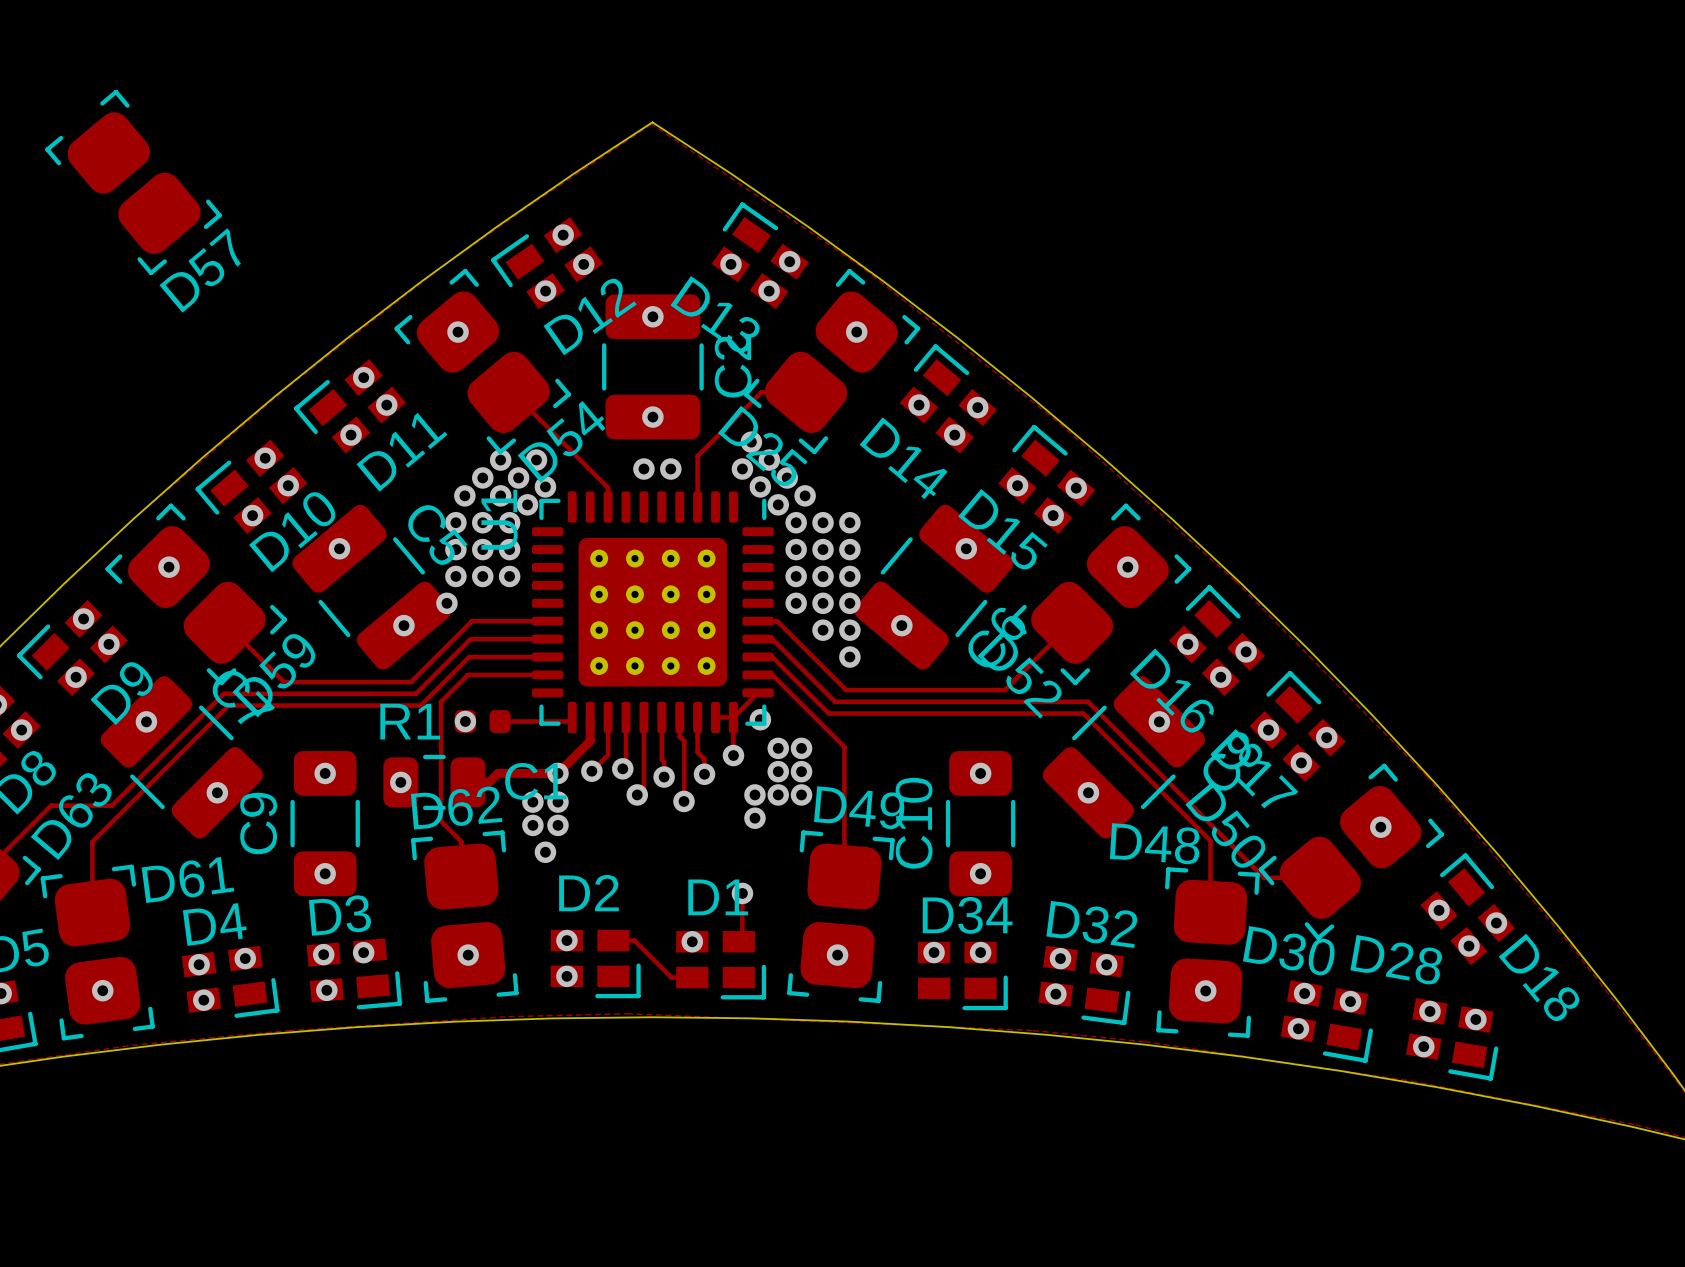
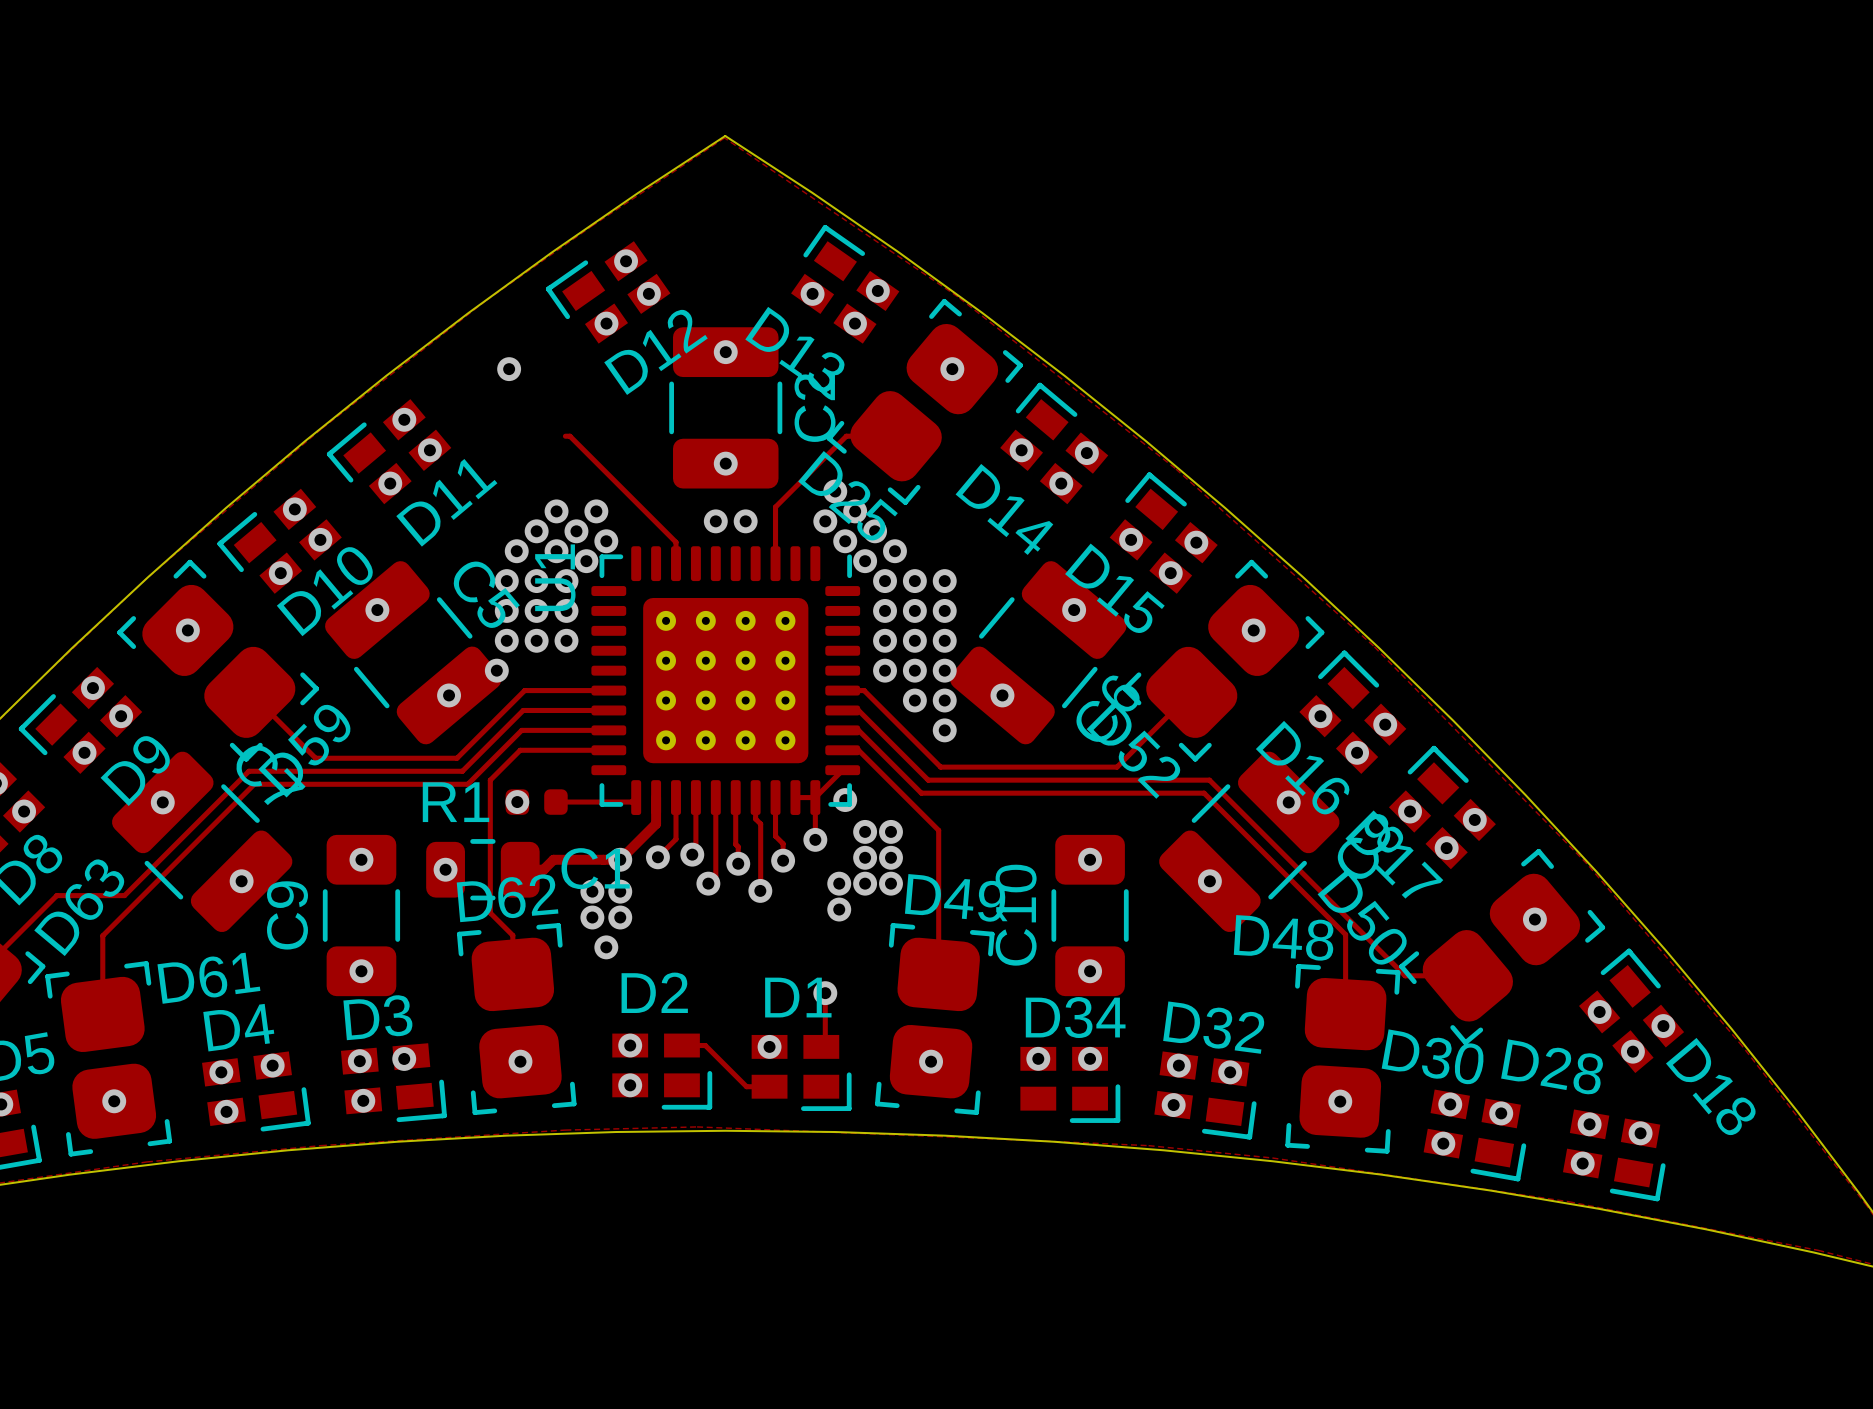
D57: (133, 182) -> none
D54: (482, 361) -> none

